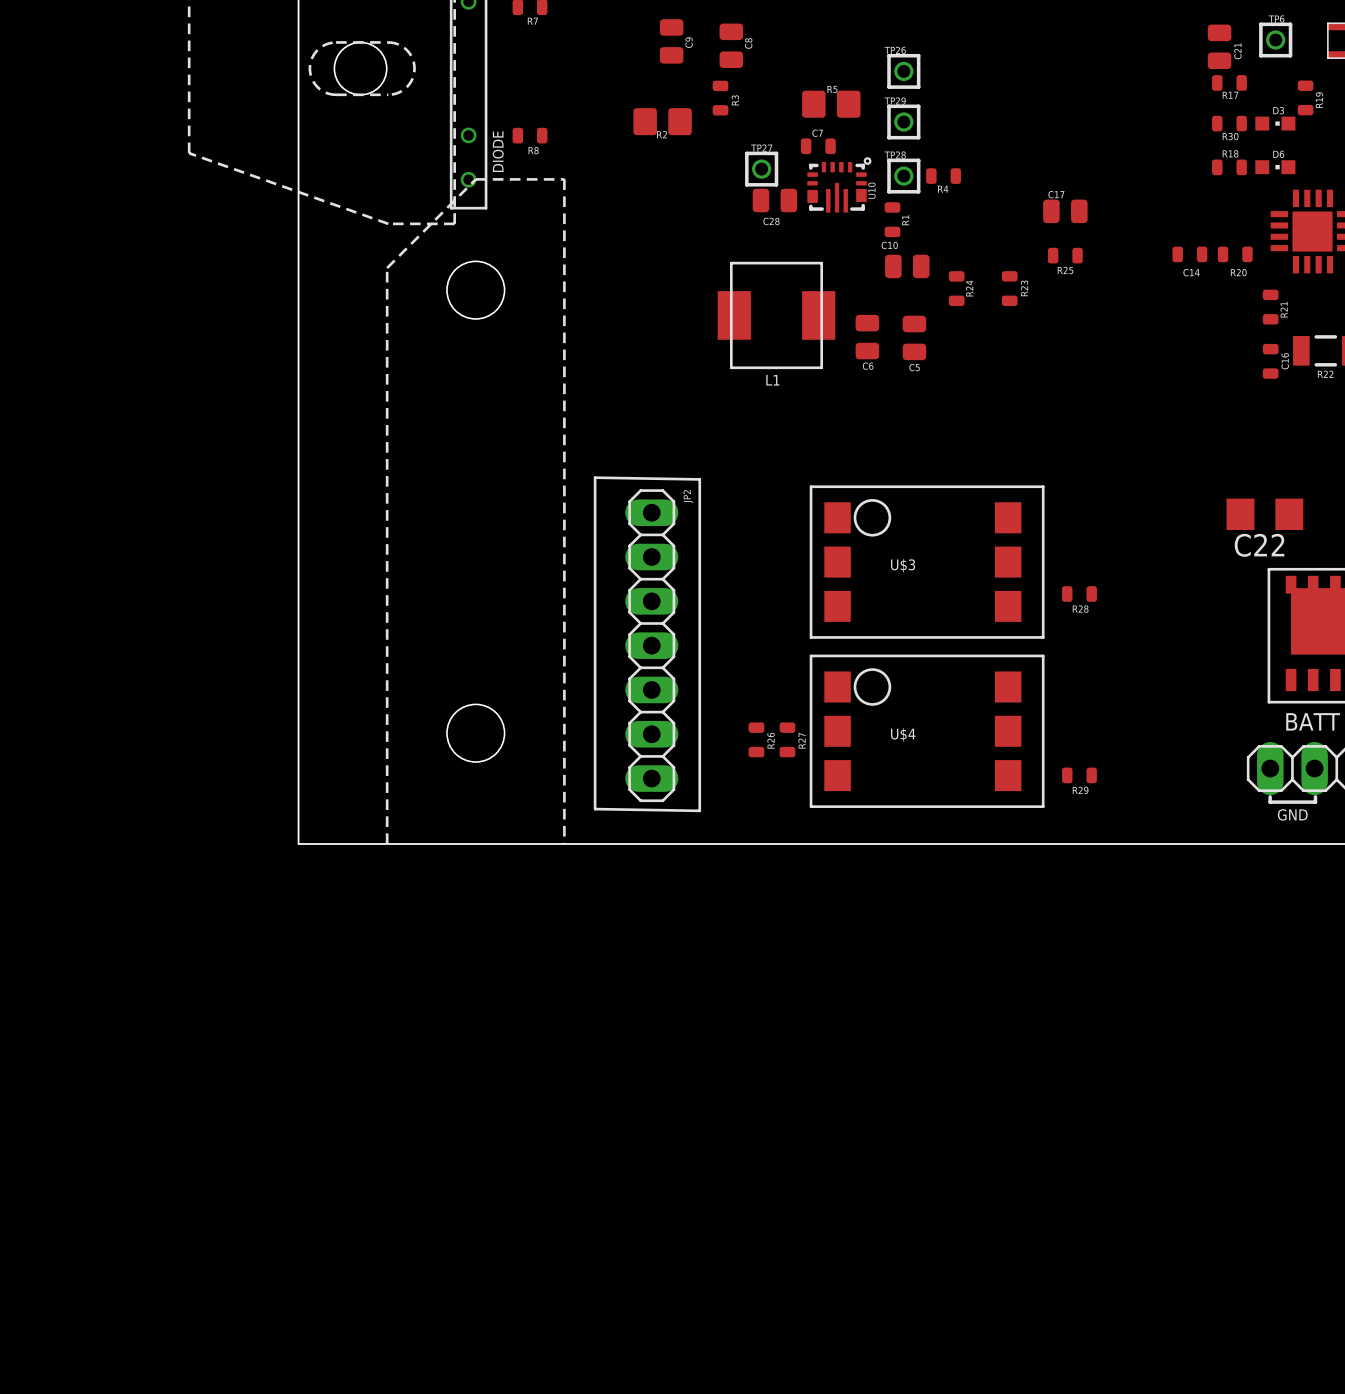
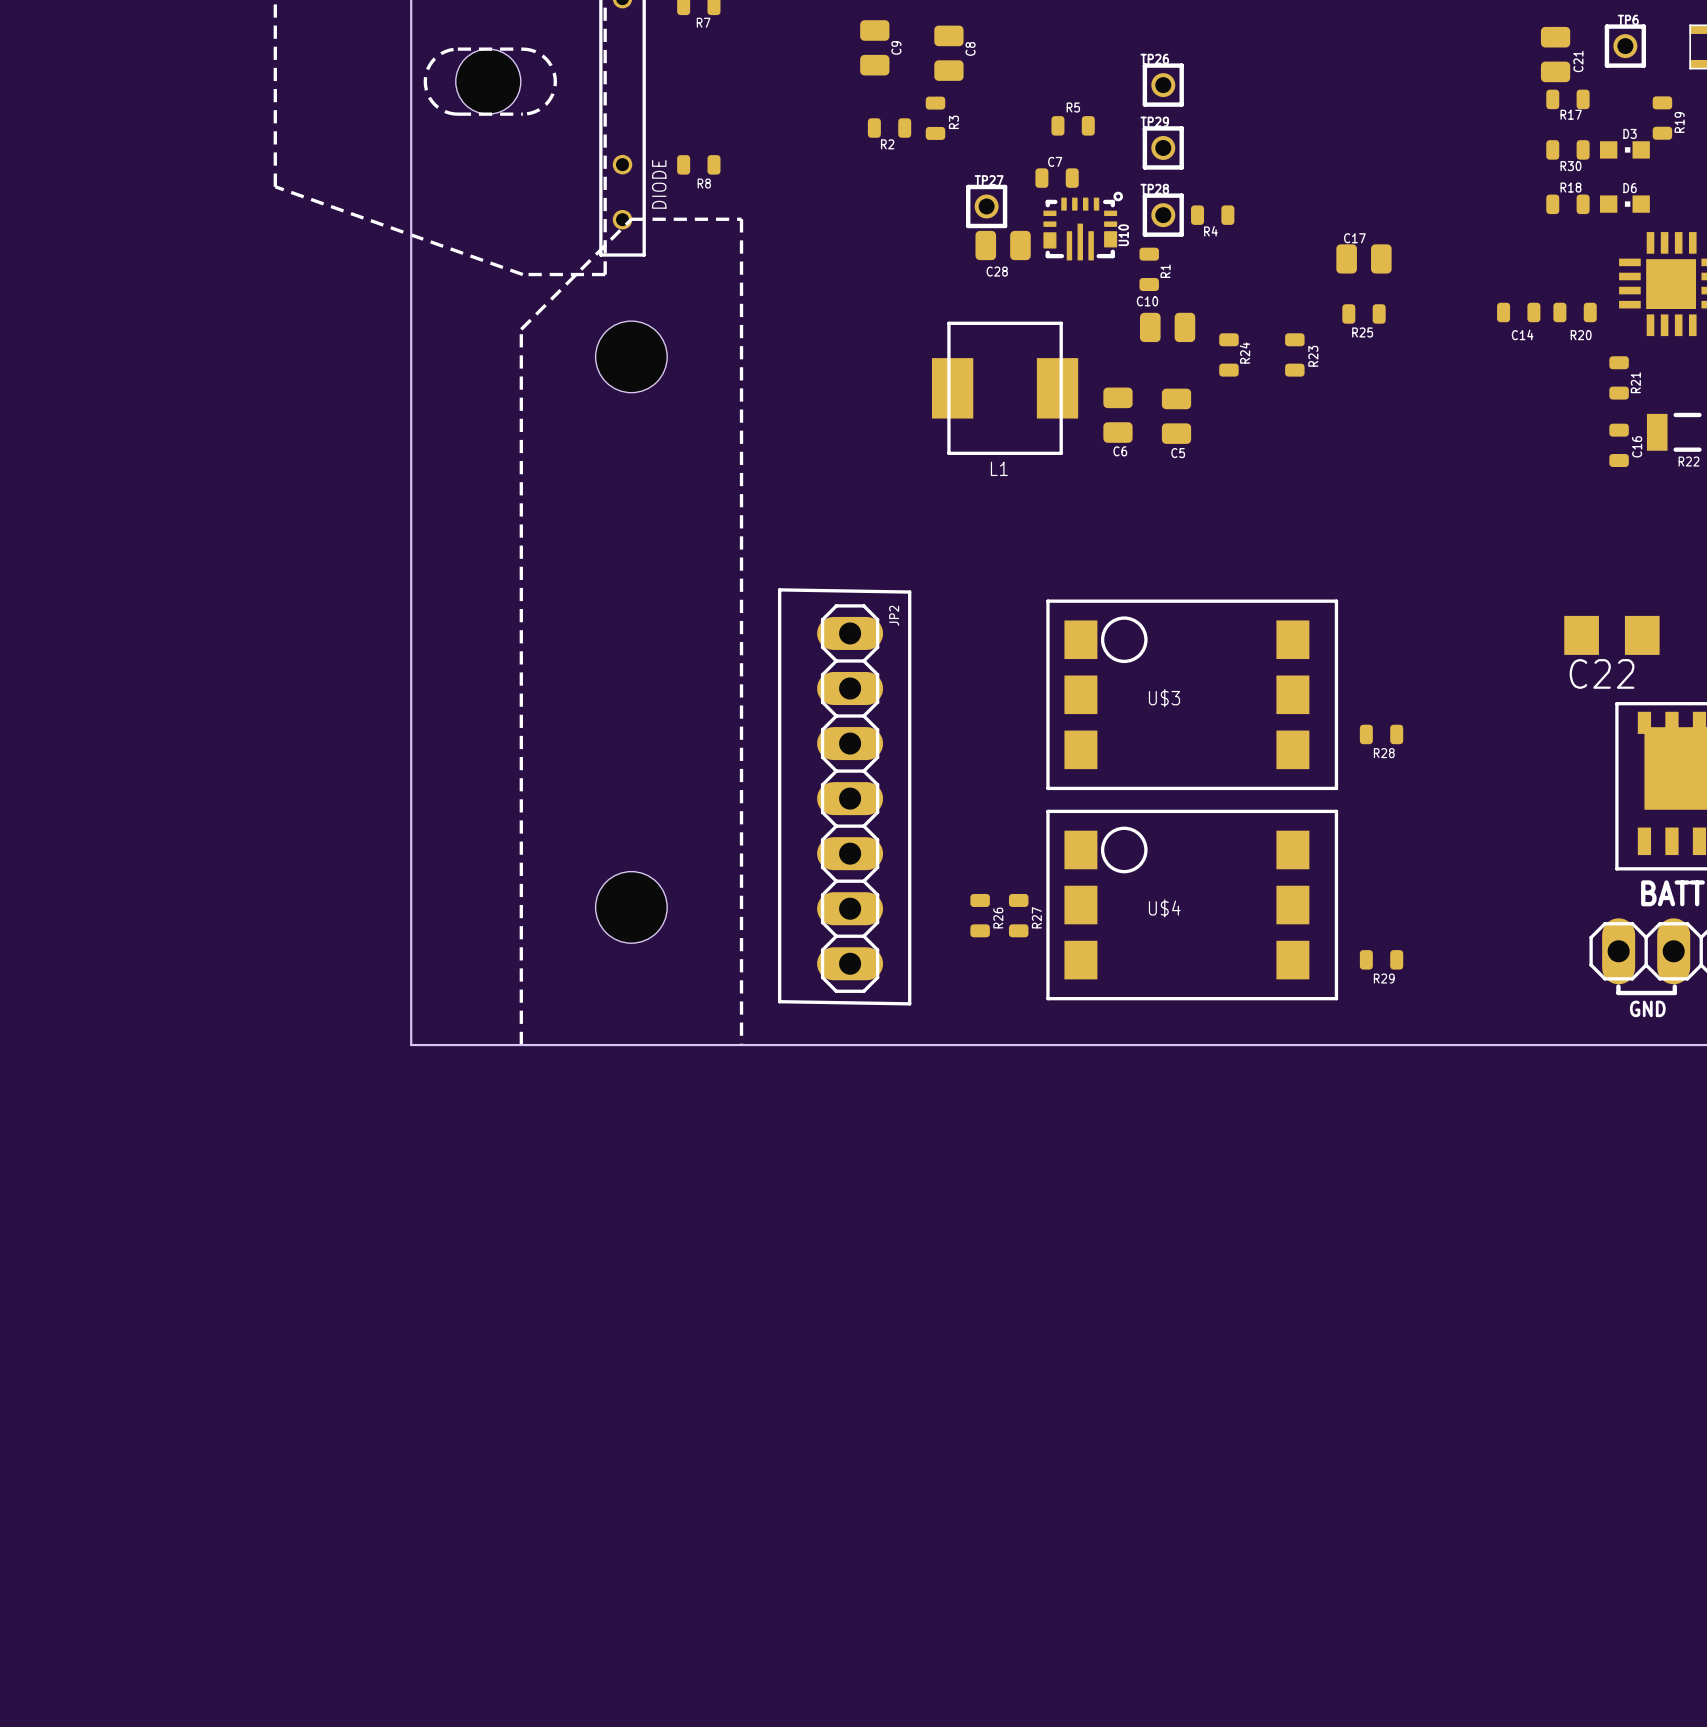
R5 footprint: [802, 90, 861, 118] -> [1051, 116, 1095, 136]
R2 footprint: [633, 108, 692, 136] -> [867, 118, 912, 138]

